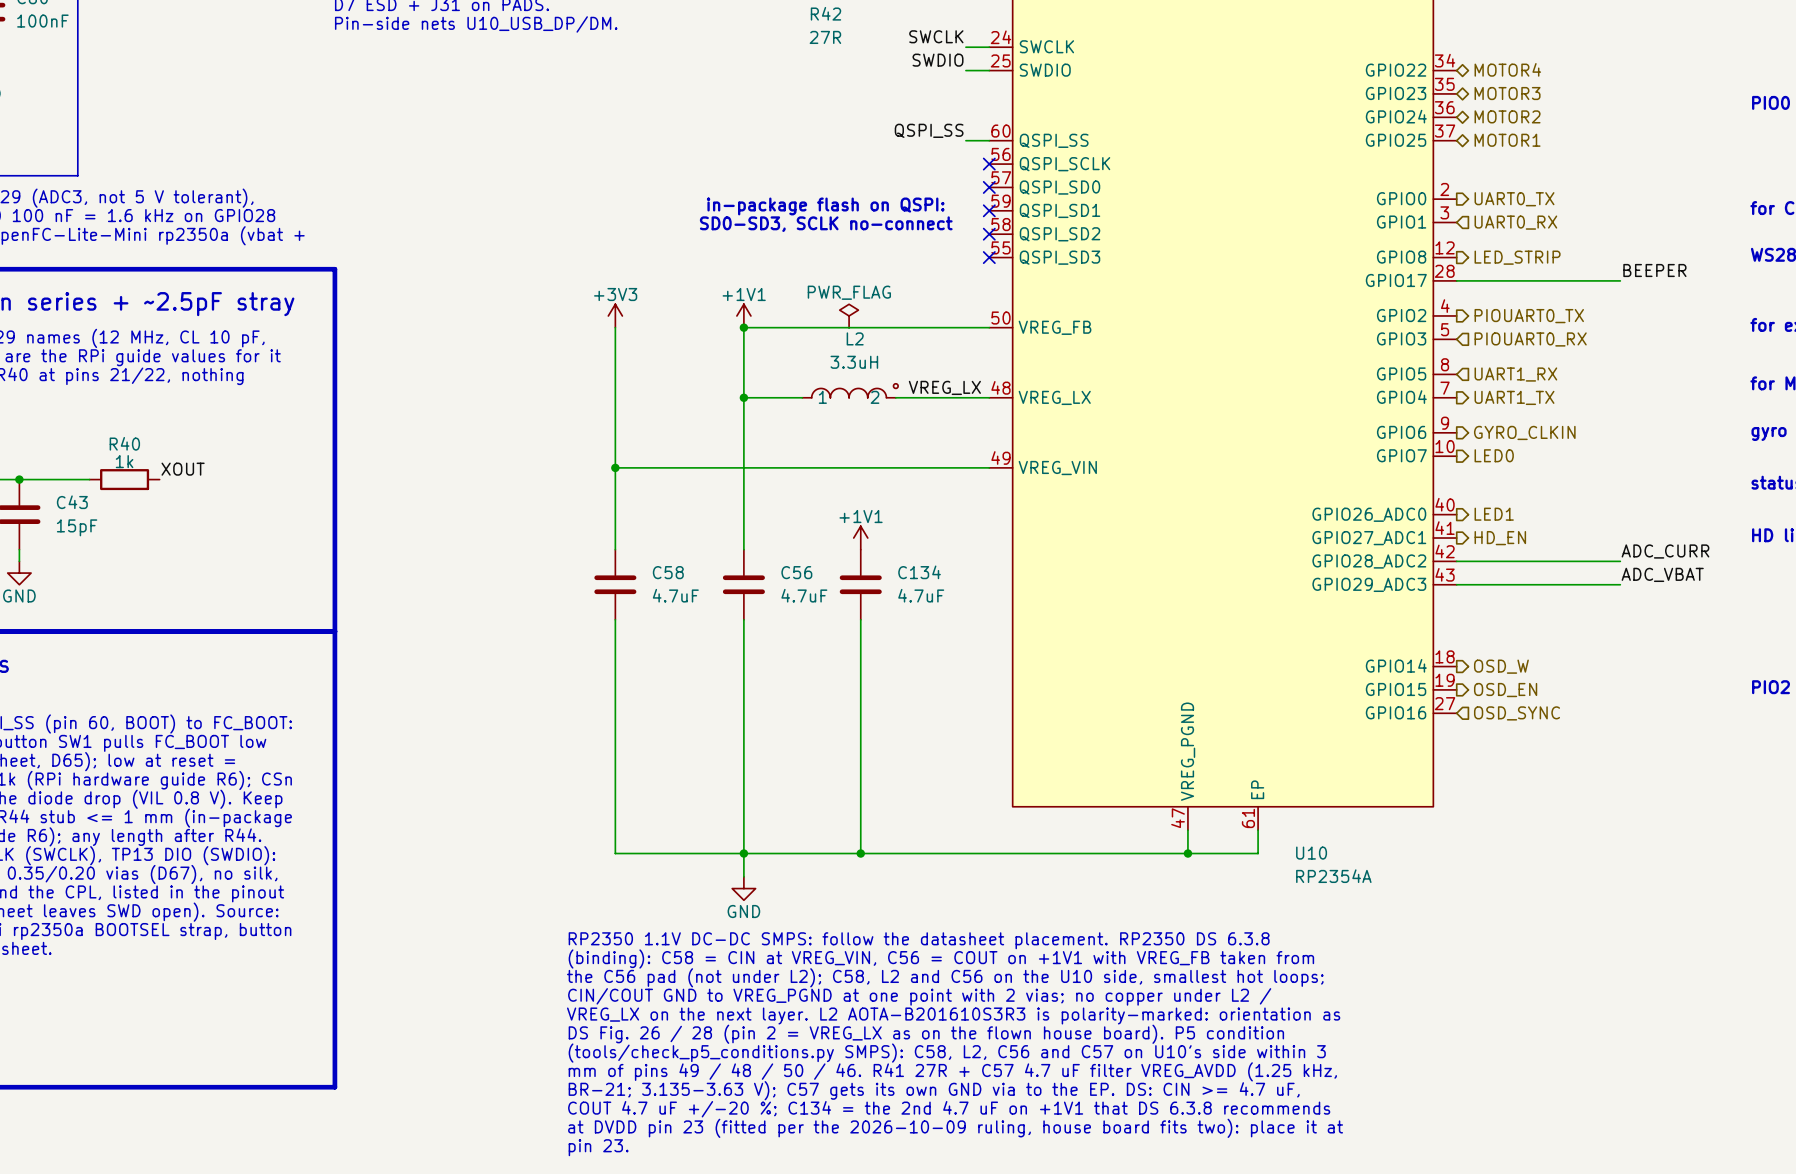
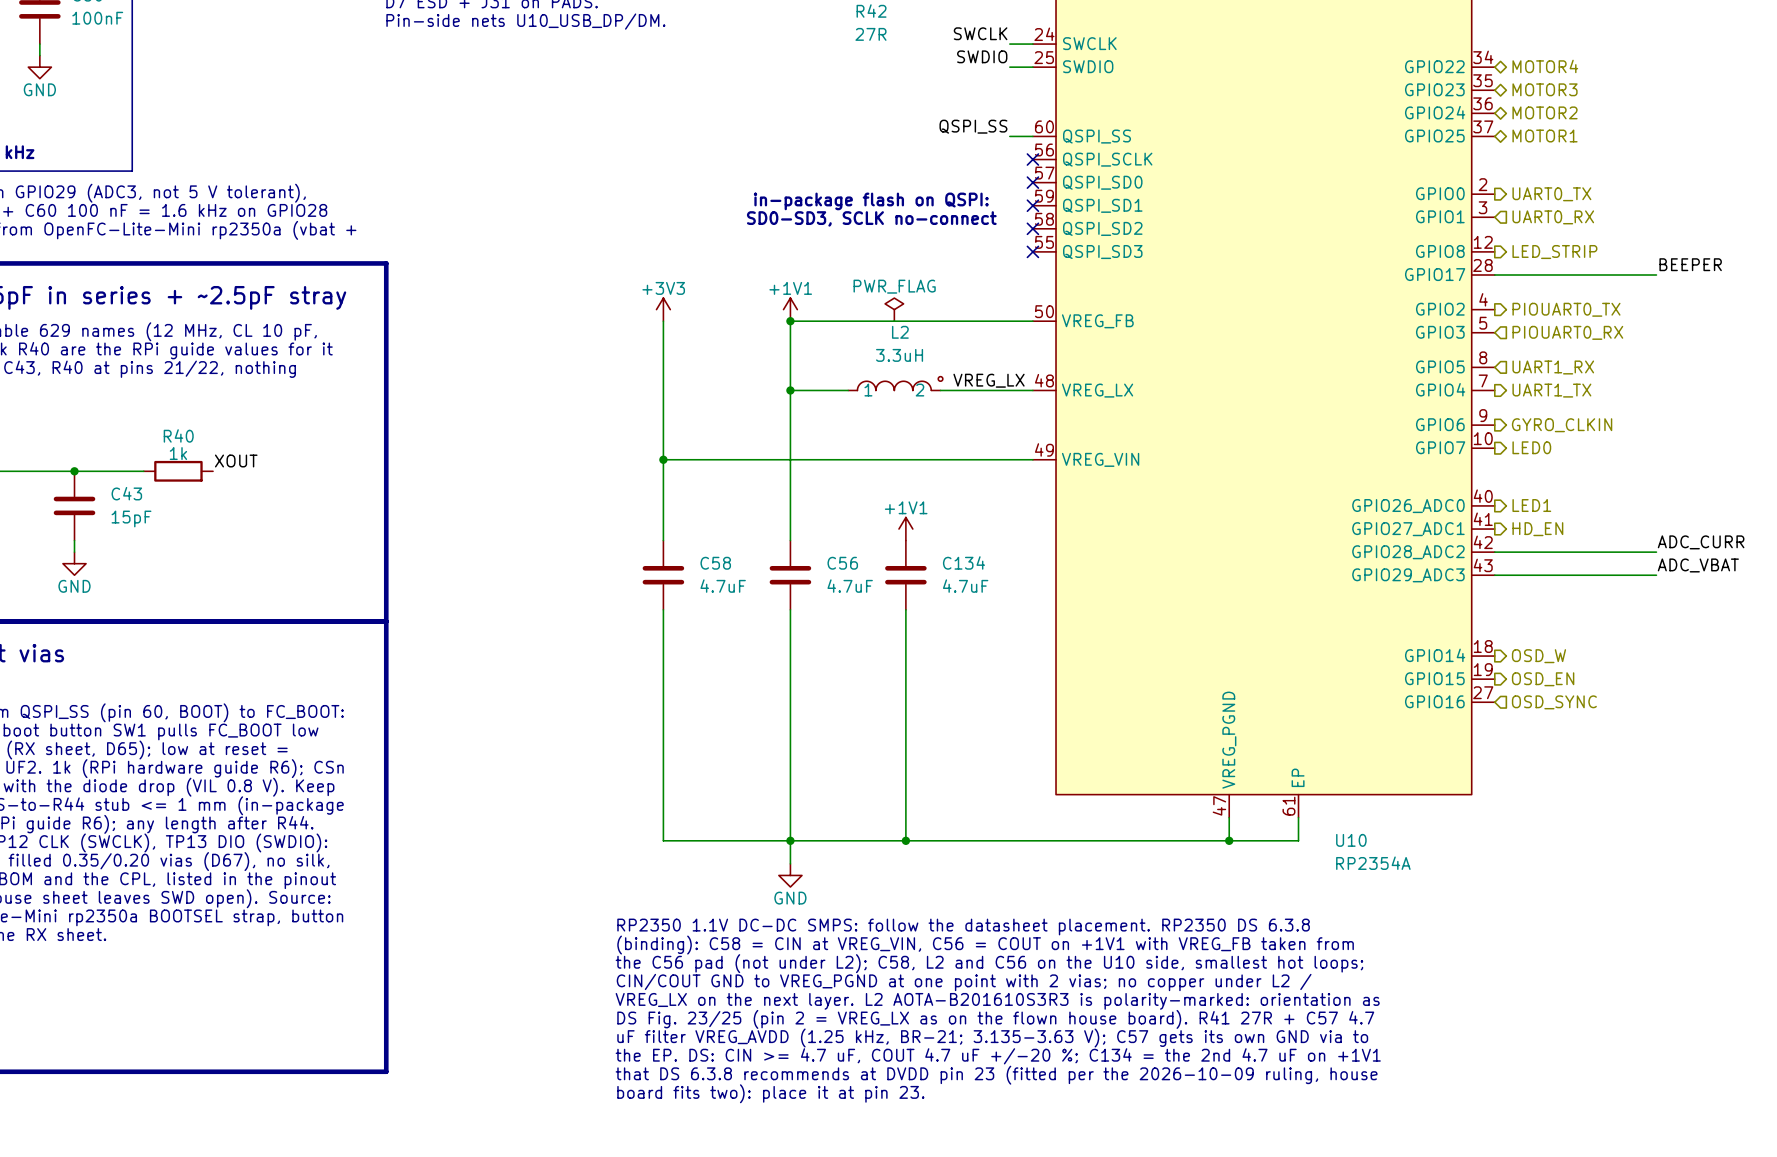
text: DS Fig. 26 / 28 (pin 2 = VREG_LX as on the flown house board). P5 condition (926, 1034) -> DS Fig. 23/25 (pin 2 = VREG_LX as on the flown house board). R41 27R + C57 4.7 (995, 1019)
text: (tools/check_p5_conditions.py SMPS): C58, L2, C56 and C57 on U10's side within 3 (947, 1053) -> uF filter VREG_AVDD (1.25 kHz, BR-21; 3.135-3.63 V); C57 gets its own GND via to (992, 1038)
text: mm of pins 49 / 48 / 50 / 46. R41 27R + C57 4.7 uF filter VREG_AVDD (1.25 kHz, (952, 1071) -> the EP. DS: CIN >= 4.7 uF, COUT 4.7 uF +/-20 %; C134 = the 2nd 4.7 uF on +1V1 (998, 1056)
text: BR-21; 3.135-3.63 V); C57 gets its own GND via to the EP. DS: CIN >= 4.7 uF, (934, 1090) -> that DS 6.3.8 recommends at DVDD pin 23 (fitted per the 2026-10-09 ruling, house (996, 1075)
text: COUT 4.7 uF +/-20 %; C134 = the 2nd 4.7 uF on +1V1 that DS 6.3.8 recommends (949, 1109) -> board fits two): place it at pin 23. (770, 1093)
text: at DVDD pin 23 (fitted per the 2026-10-09 ruling, house board fits two): place it at (955, 1128) -> none
text: pin 23. (598, 1147) -> none

